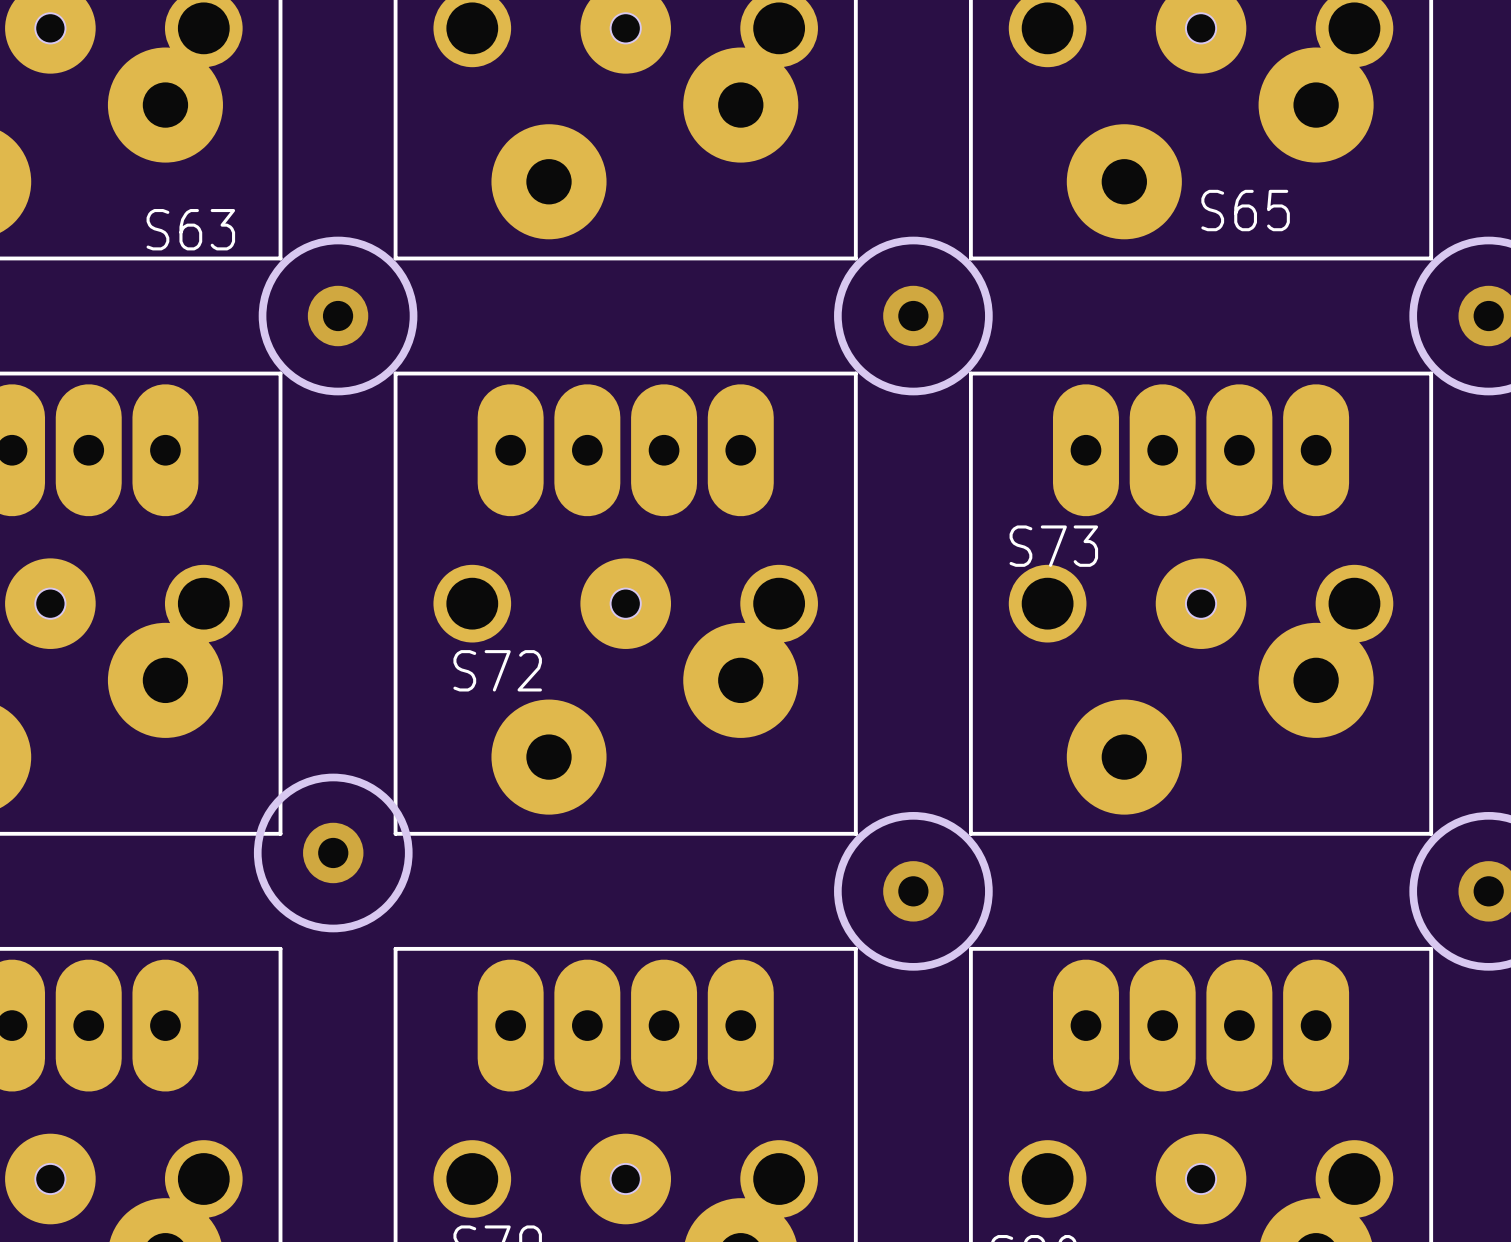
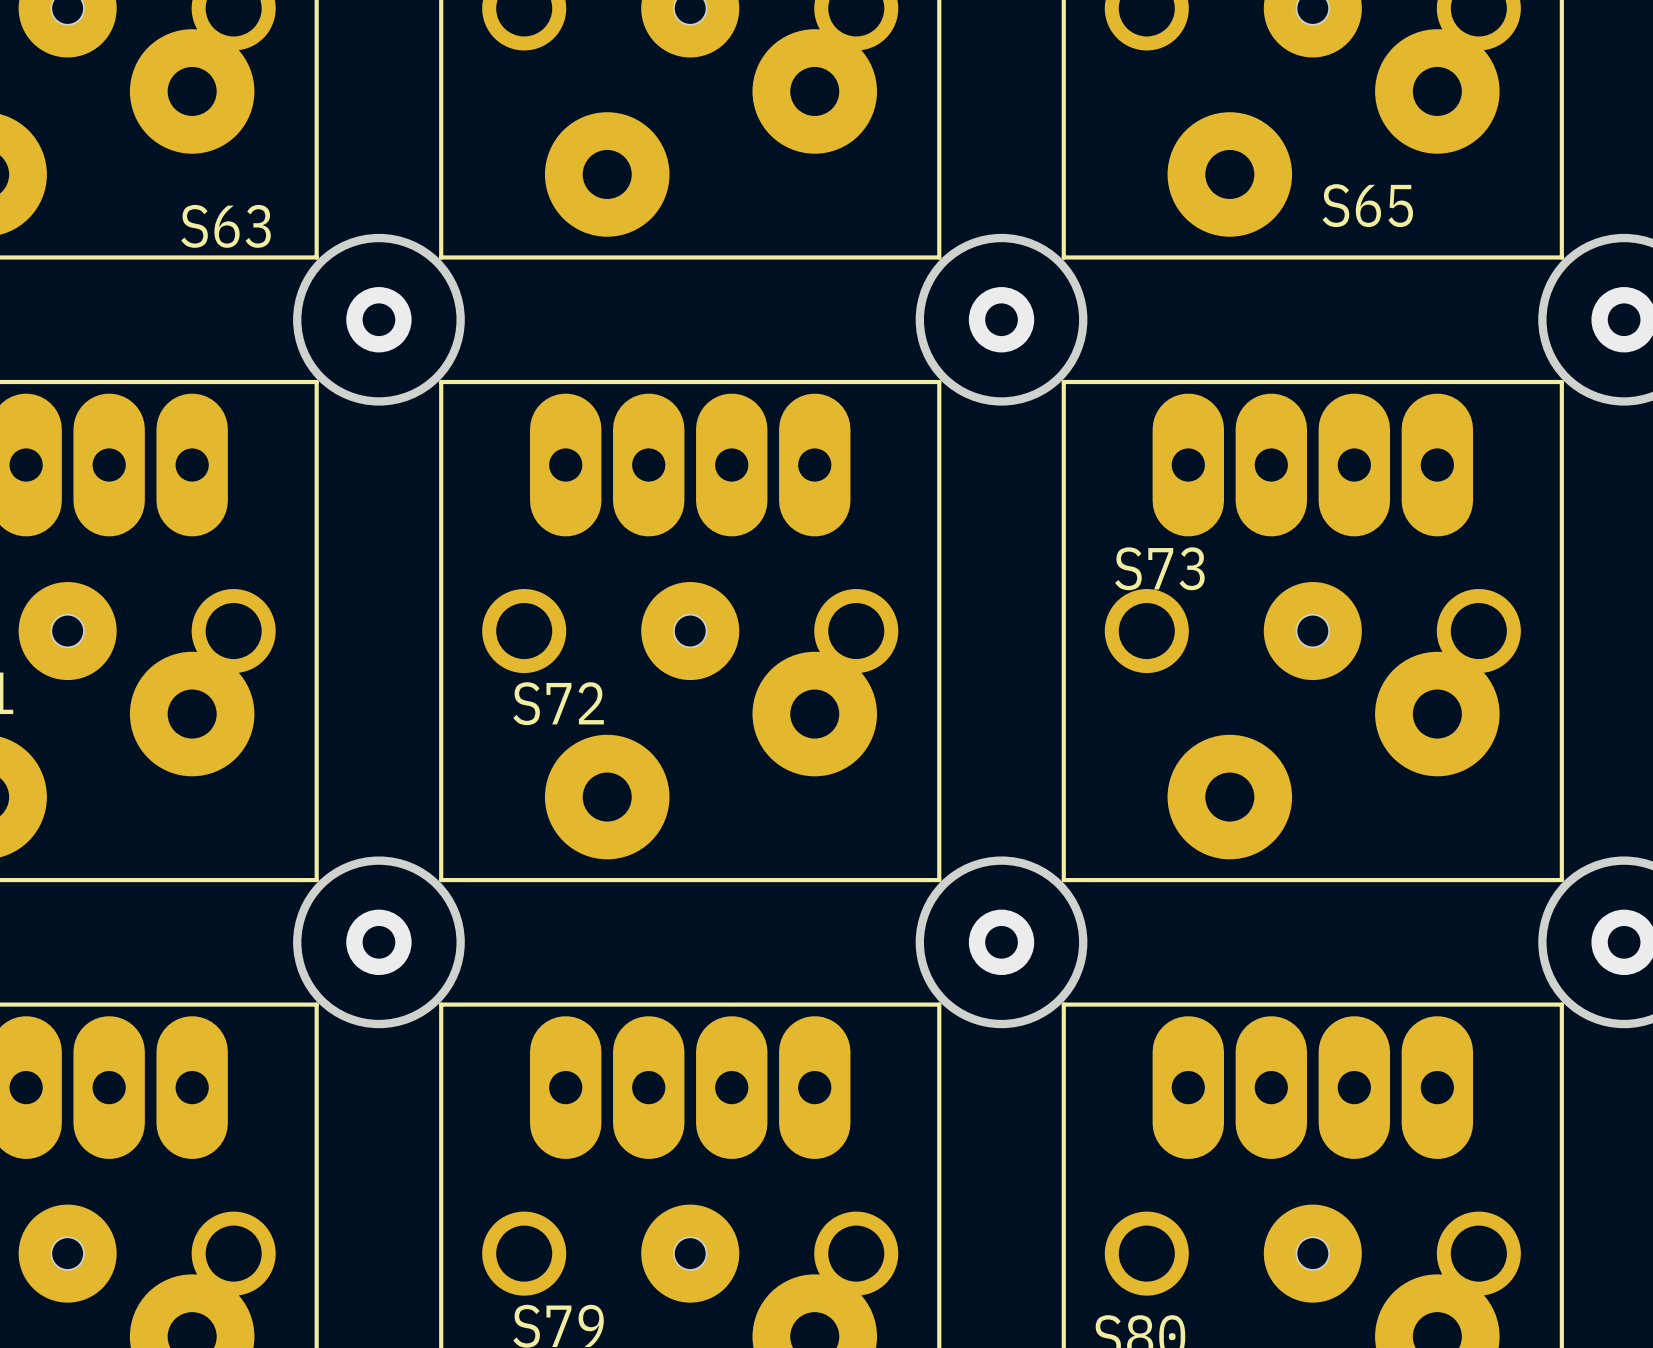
round board edge position: (333, 852) -> (378, 942)
via position: (333, 852) -> (378, 942)

